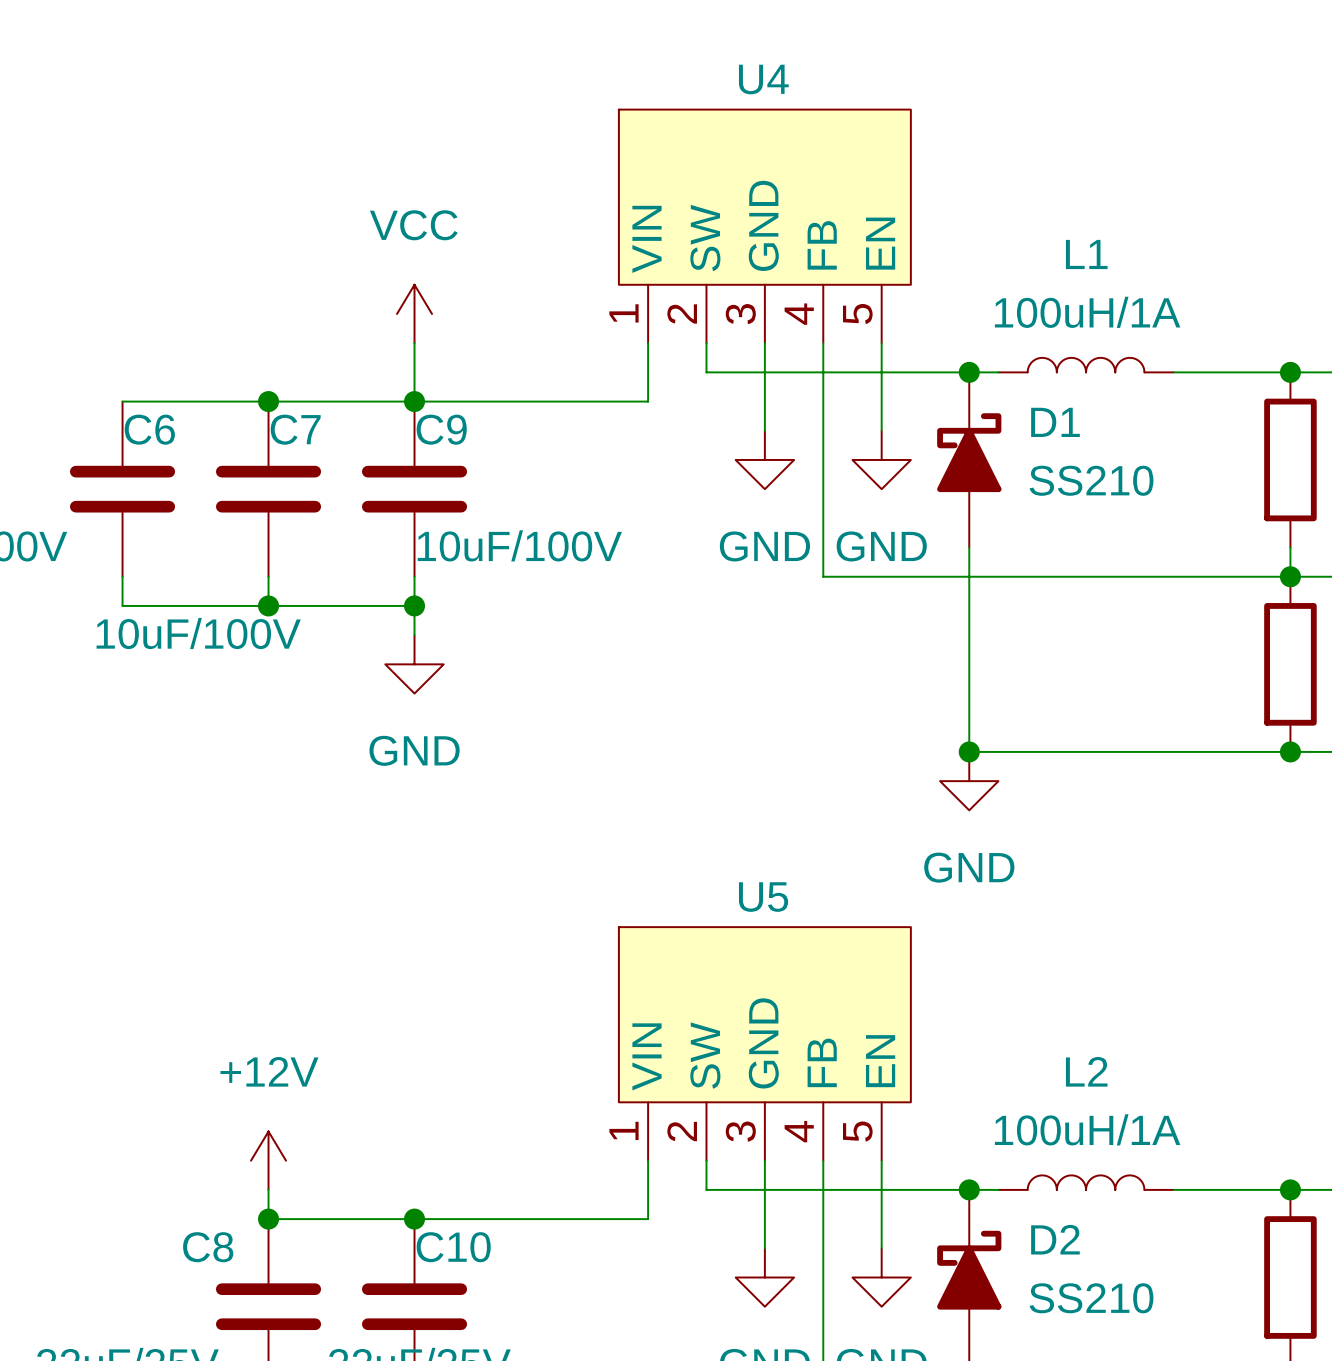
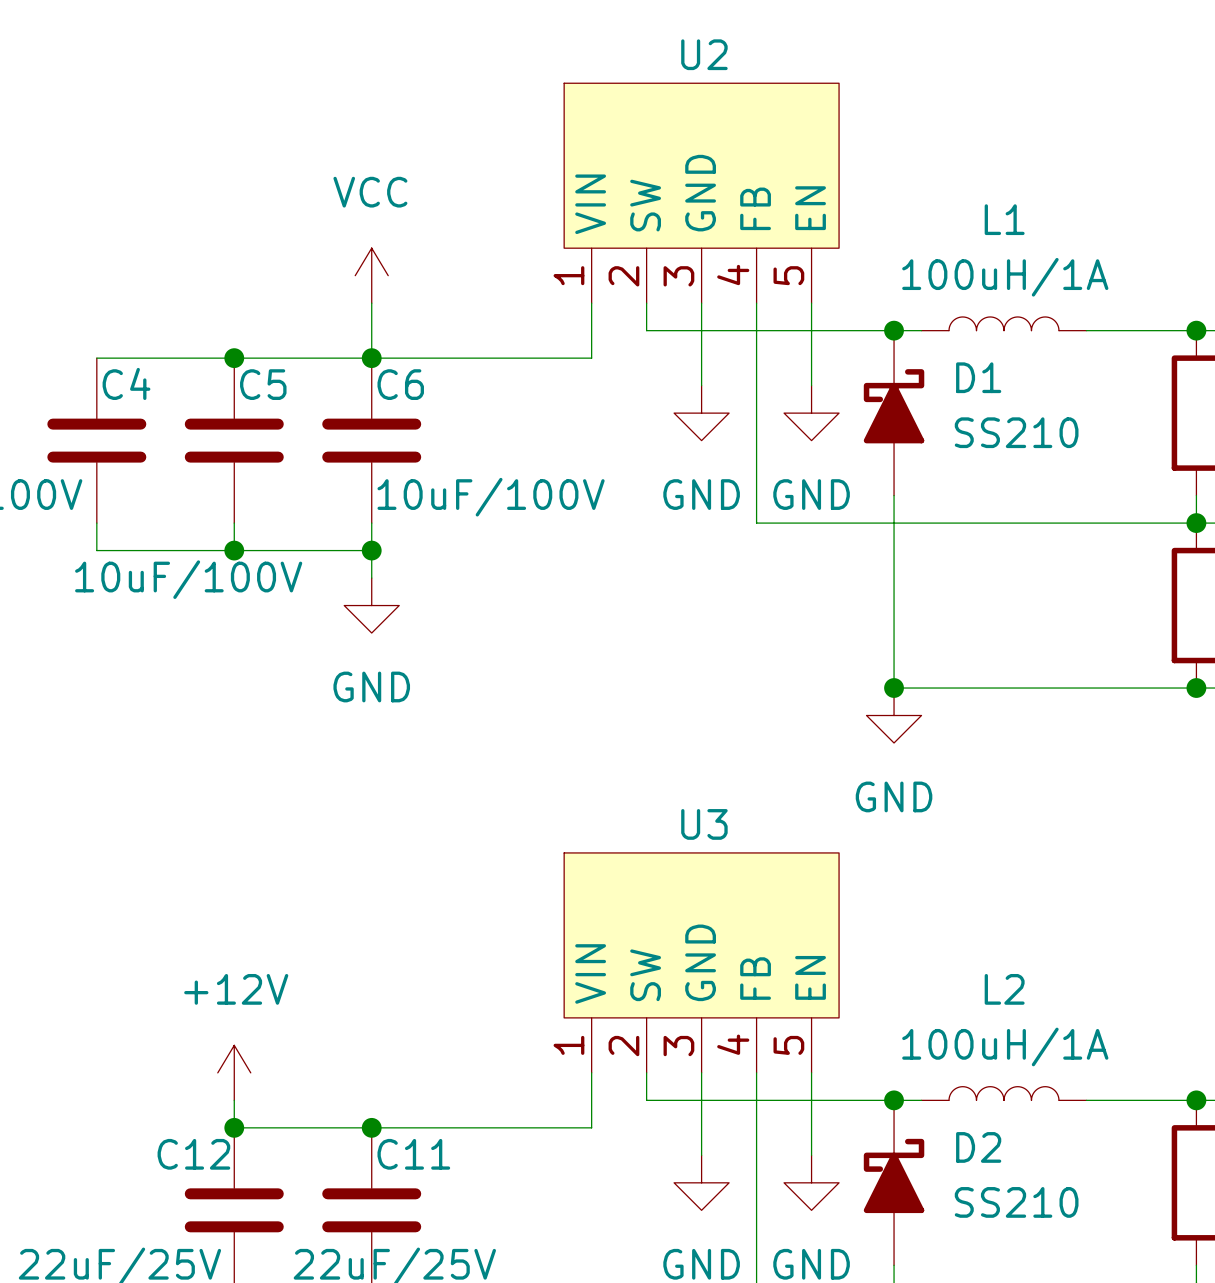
U4 name: U4 (763, 79) -> U2 (704, 54)
C6 name: C6 (149, 429) -> C4 (126, 383)
C7 name: C7 (295, 429) -> C5 (263, 384)
C9 name: C9 (441, 429) -> C6 (400, 384)
U5 name: U5 (763, 897) -> U3 (704, 824)
C8 name: C8 (208, 1247) -> C12 (193, 1154)
C10 name: C10 (453, 1247) -> C11 (413, 1154)

